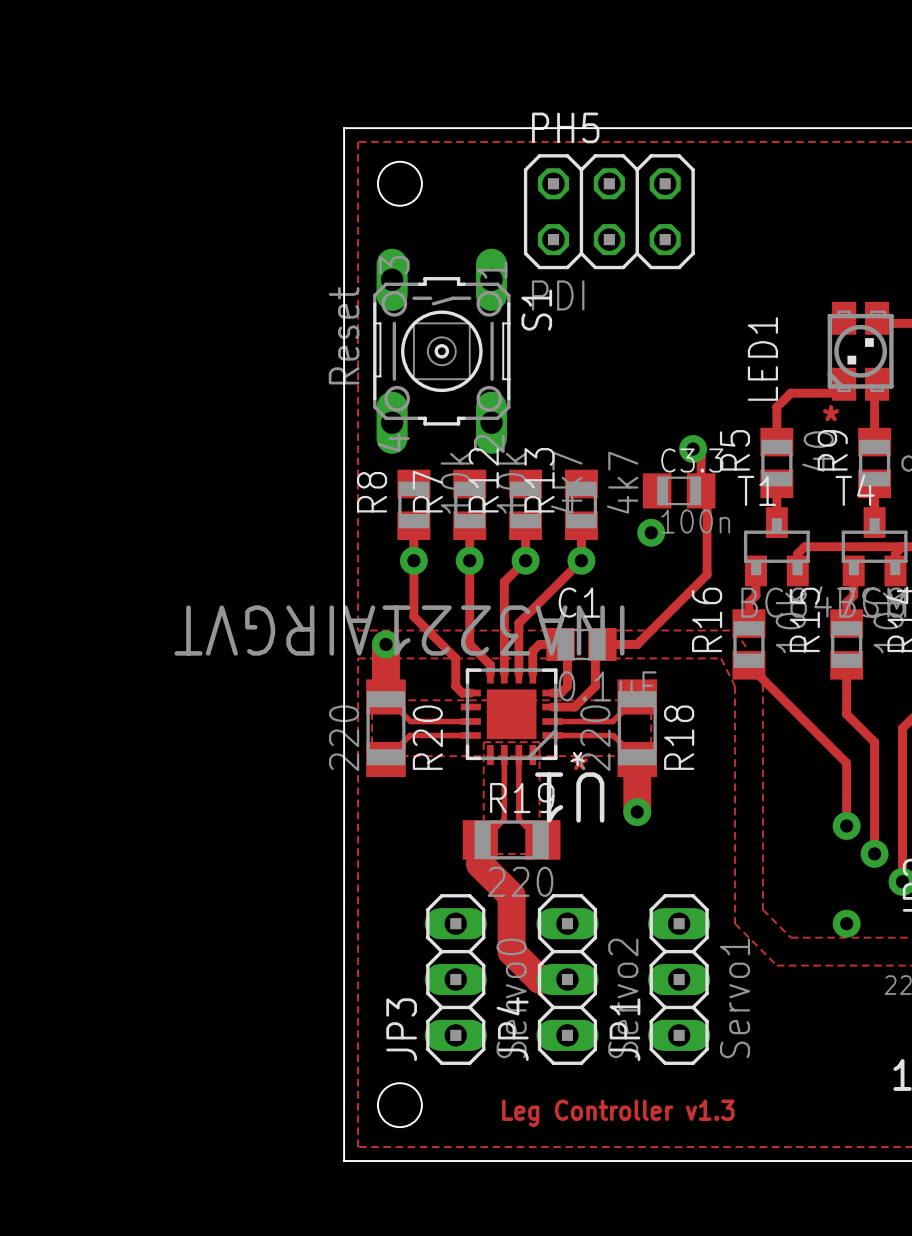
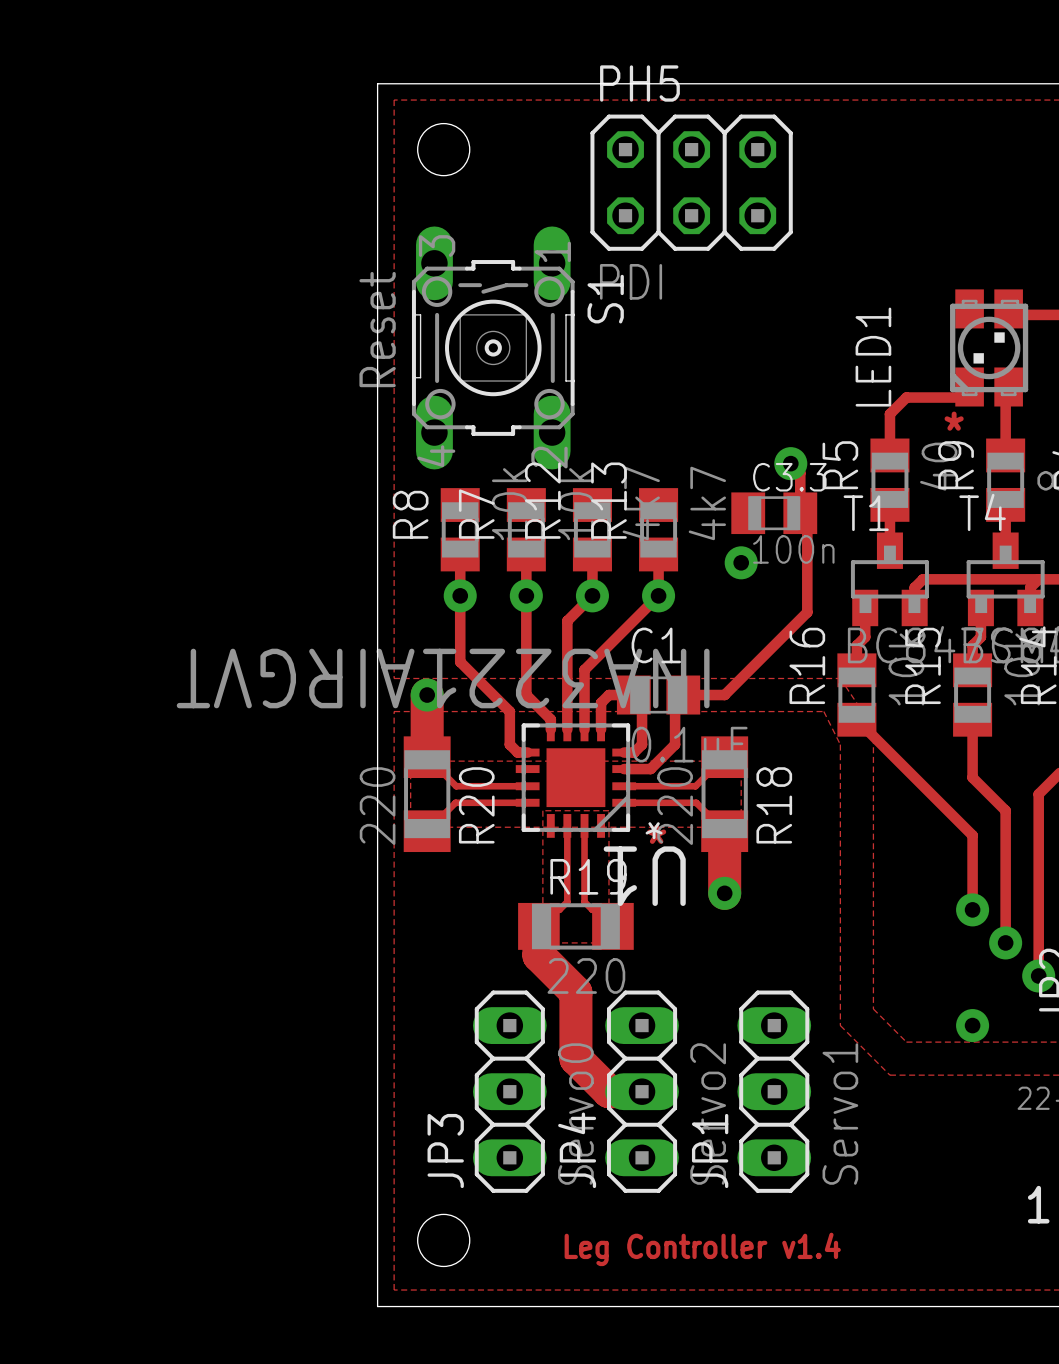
text: Leg Controller v1.3 (618, 1113) -> Leg Controller v1.4 (702, 1249)

